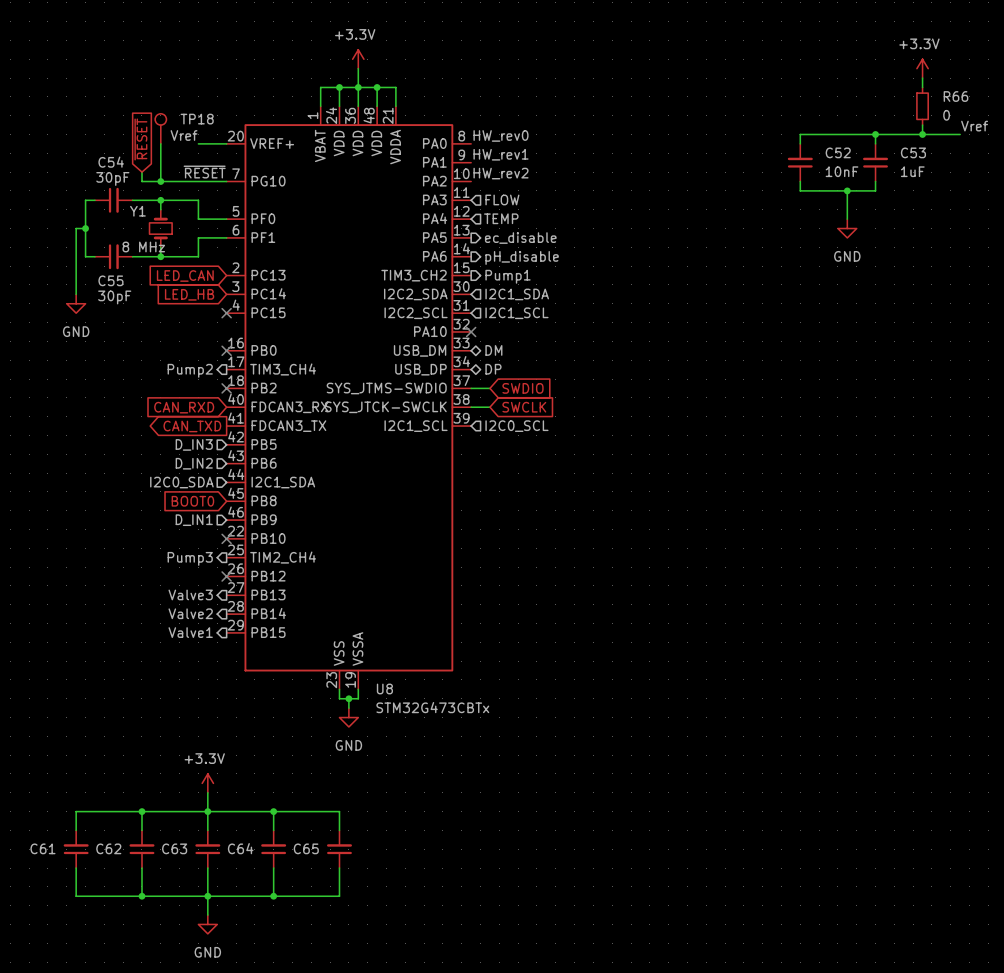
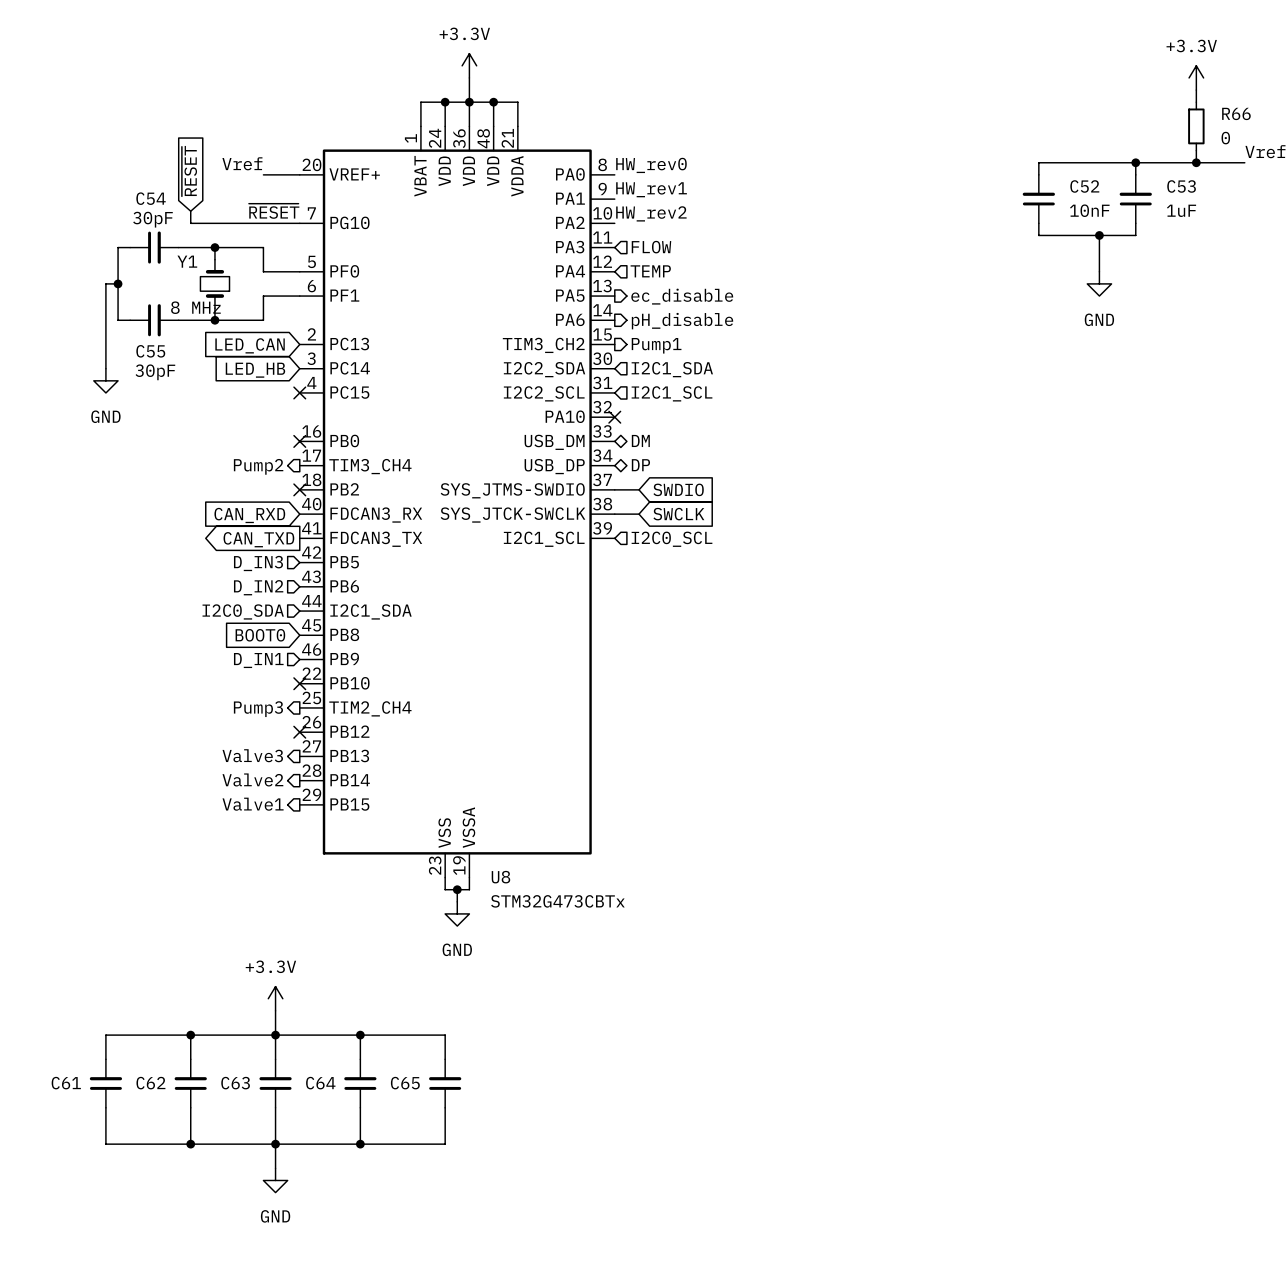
TP18: (160, 128) -> none
wire: (160, 143) (160, 181) -> none
junction: (160, 181) -> none

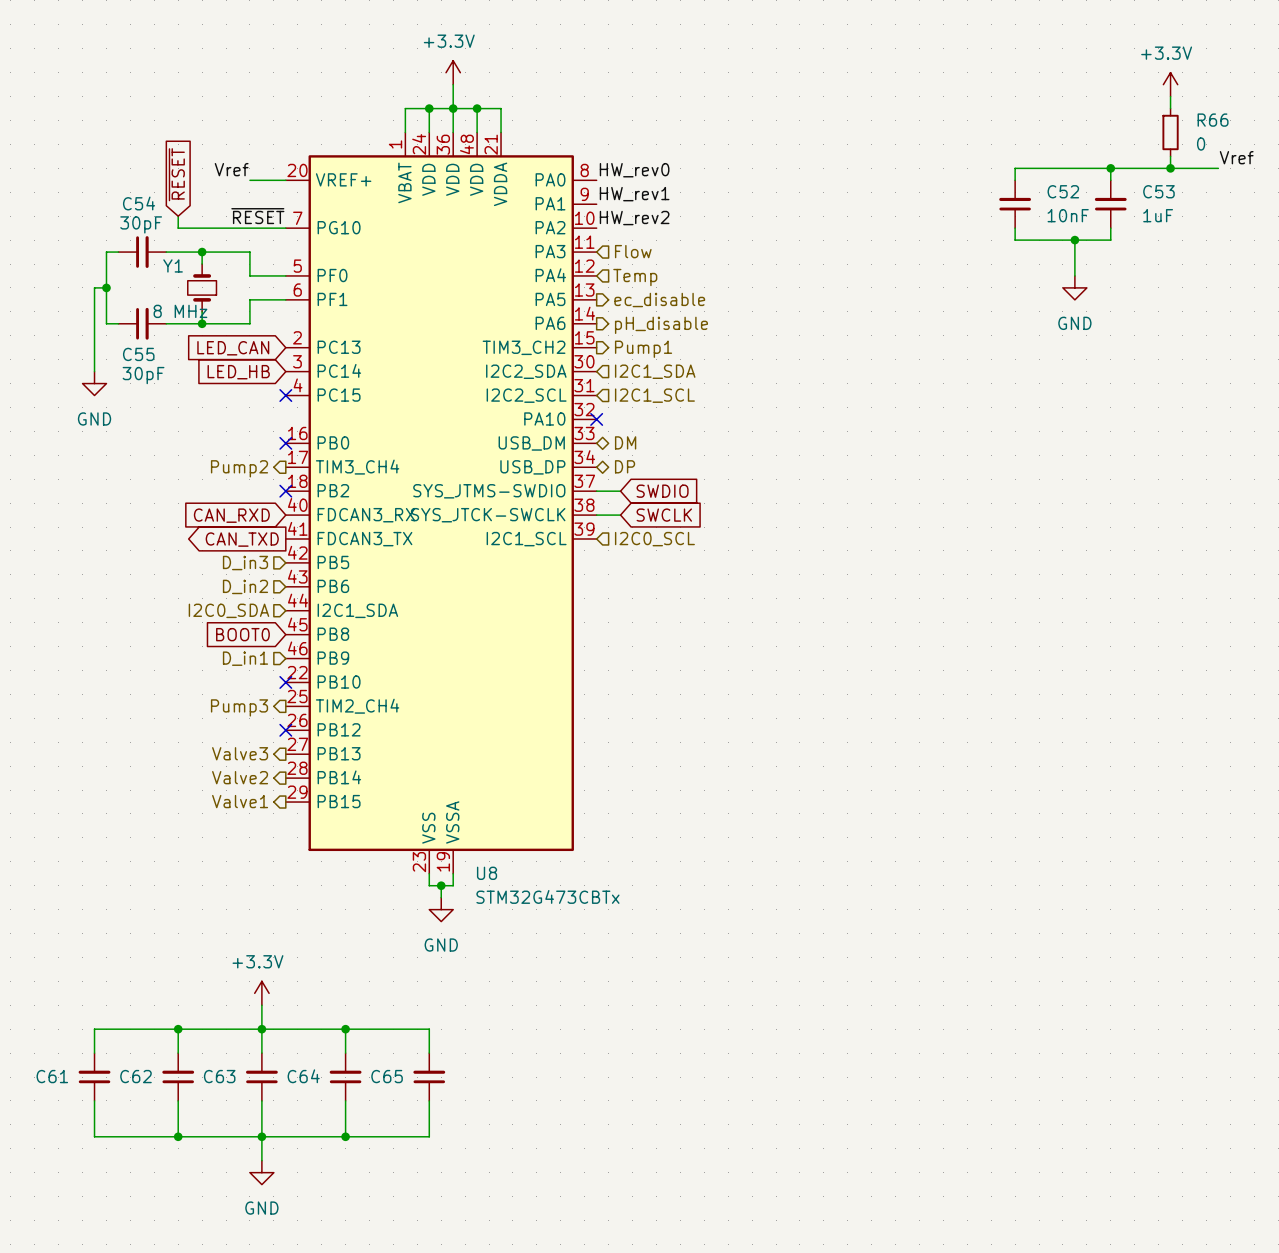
hierarchical label: FLOW (651, 247) -> Flow (633, 251)
hierarchical label: TEMP (650, 271) -> Temp (635, 277)
hierarchical label: D_IN3 (258, 563) -> D_in3 (245, 563)
hierarchical label: D_IN2 (258, 587) -> D_in2 (245, 586)
hierarchical label: D_IN1 (258, 660) -> D_in1 (245, 658)

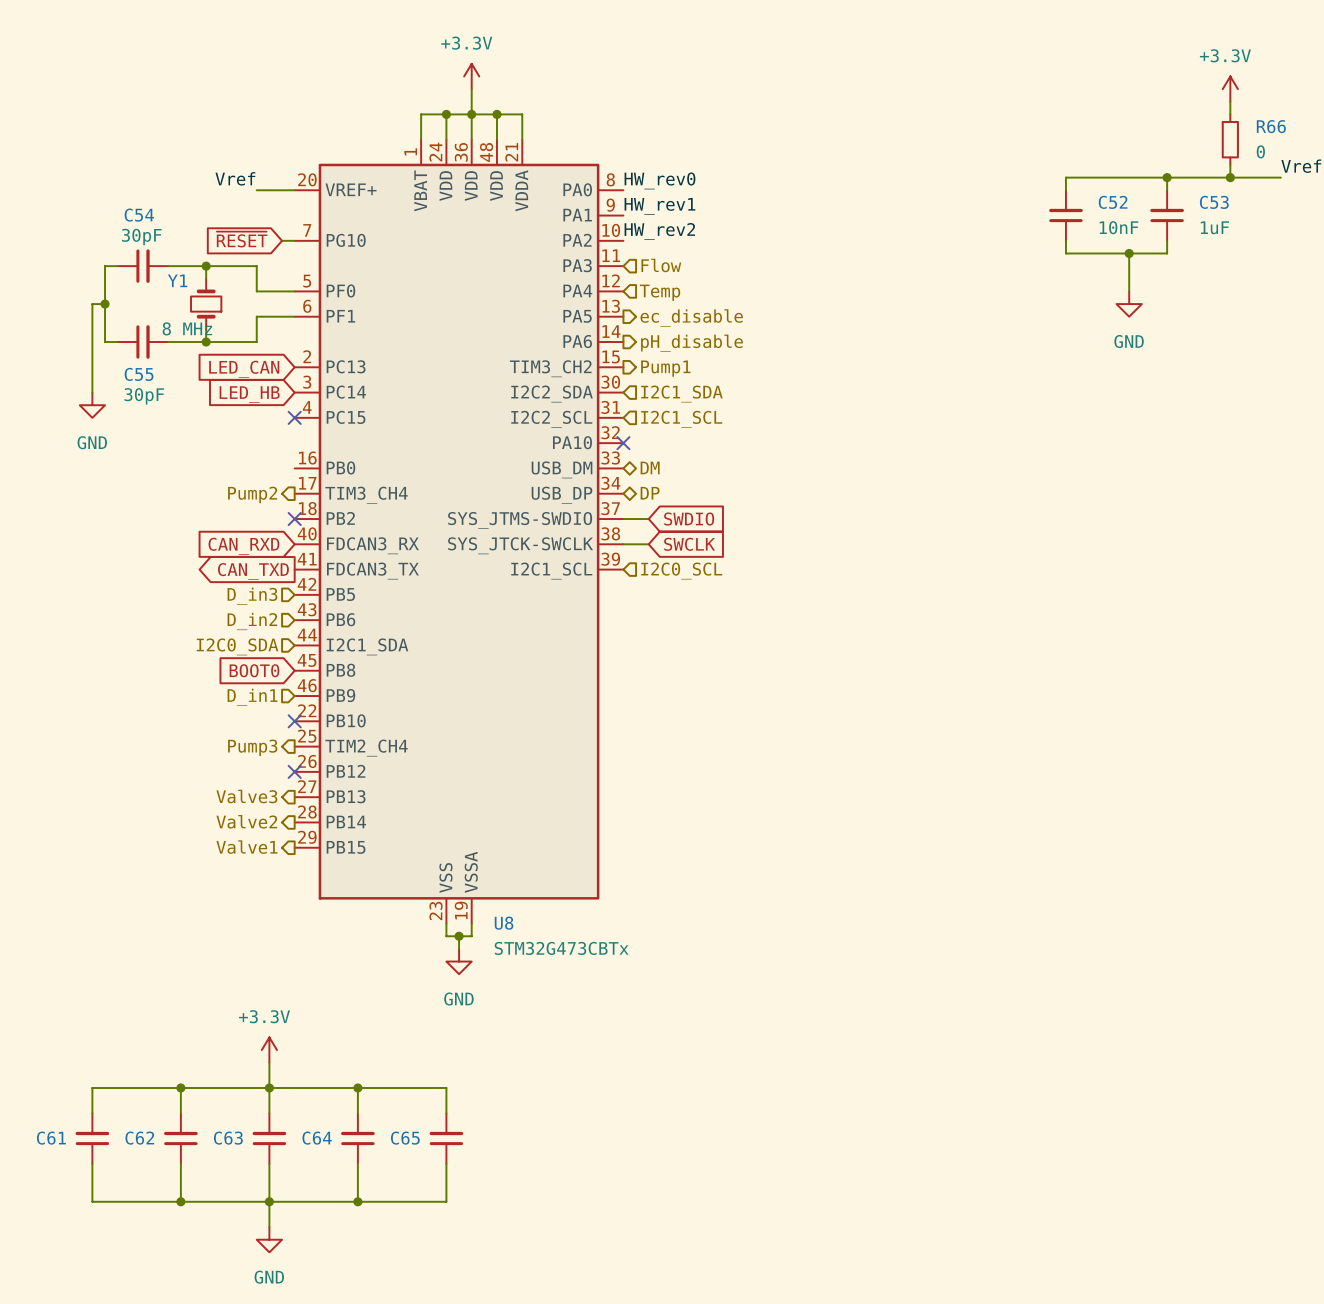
global label rotation: 0° (176, 174) -> 90° counterclockwise (242, 239)
wire: (178, 216) (178, 228) (273, 228) -> none
label: ~{RESET} (257, 216) -> none
no-connect mark: (285, 443) -> none

